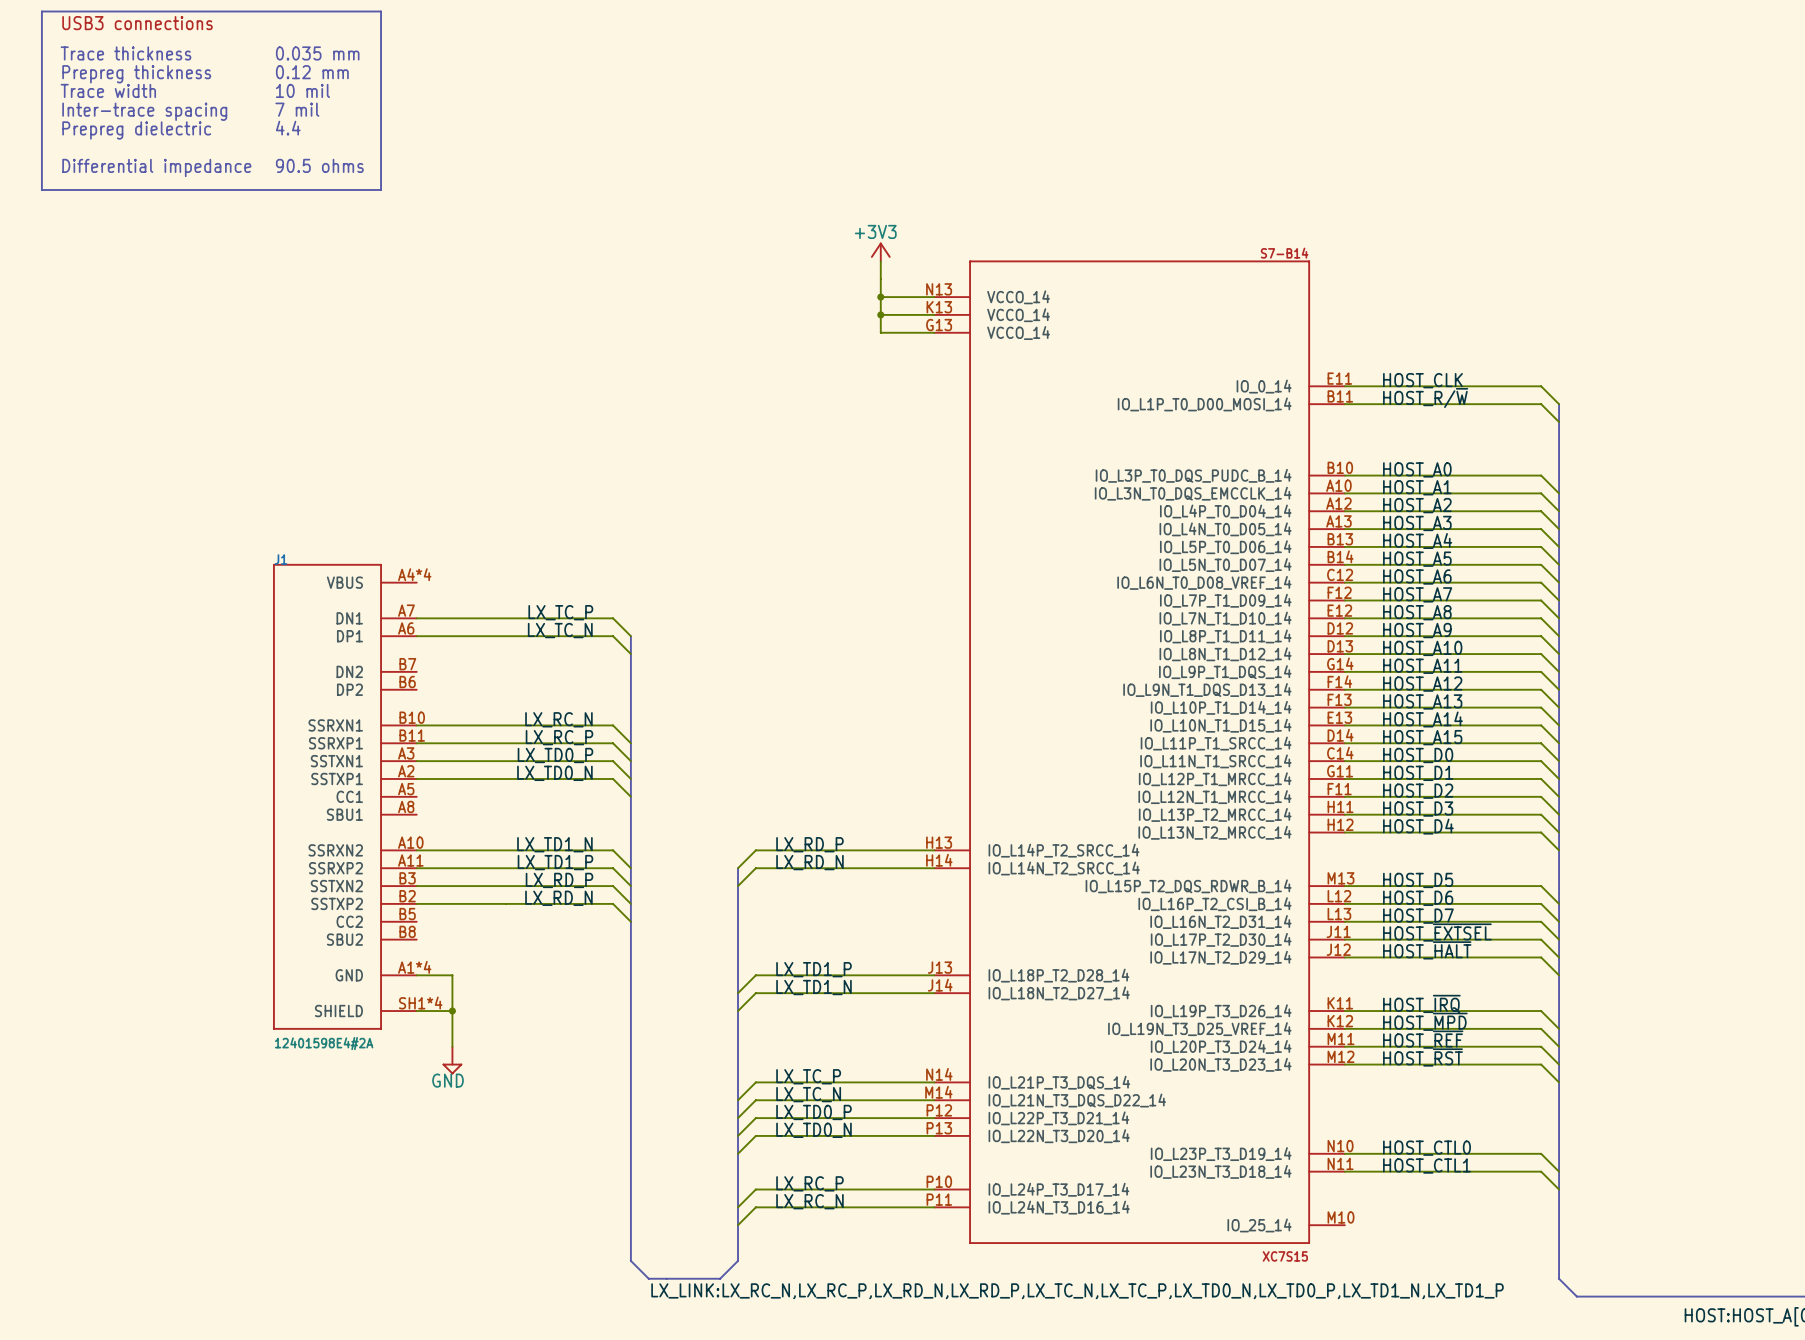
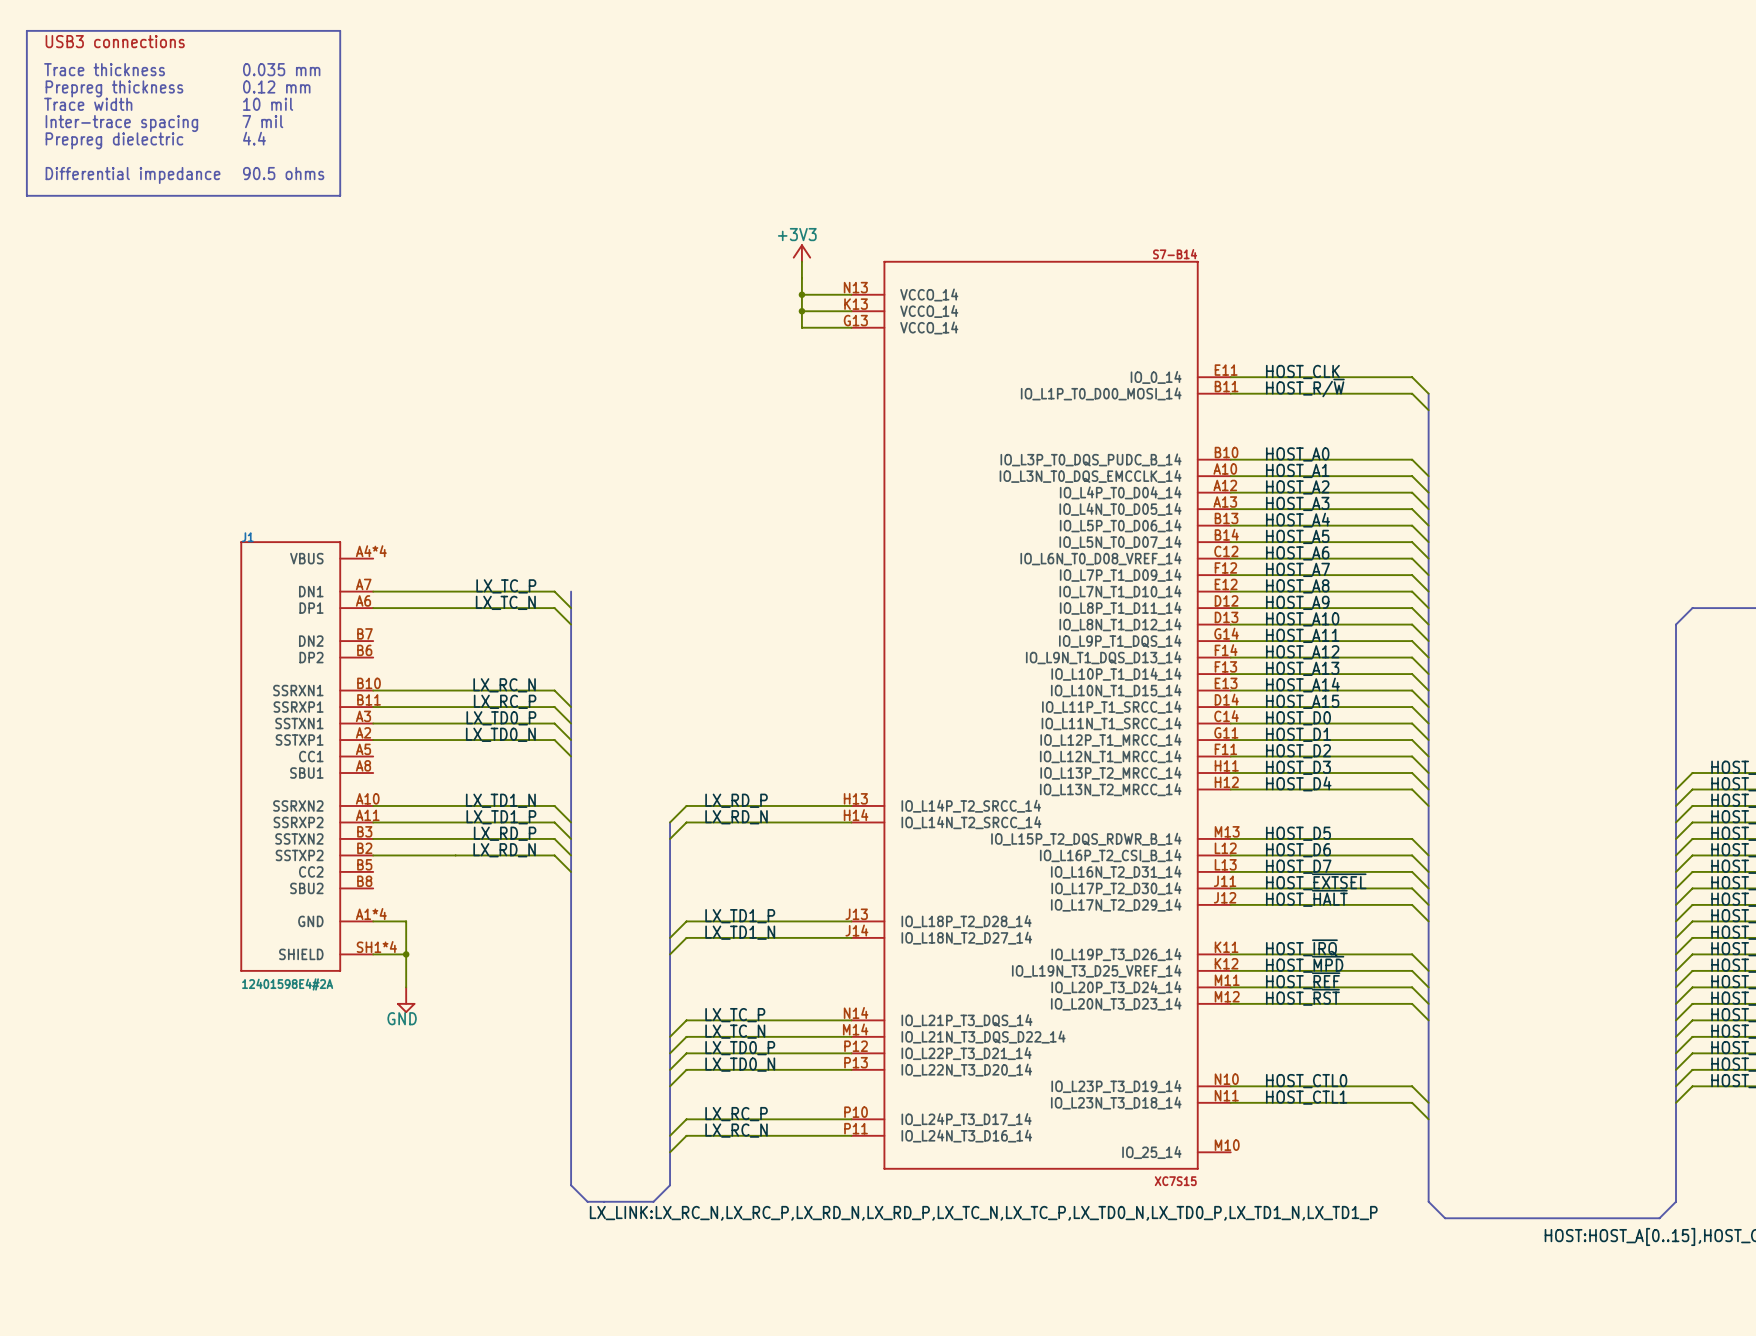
bus: none -> (571, 591) (571, 608)

